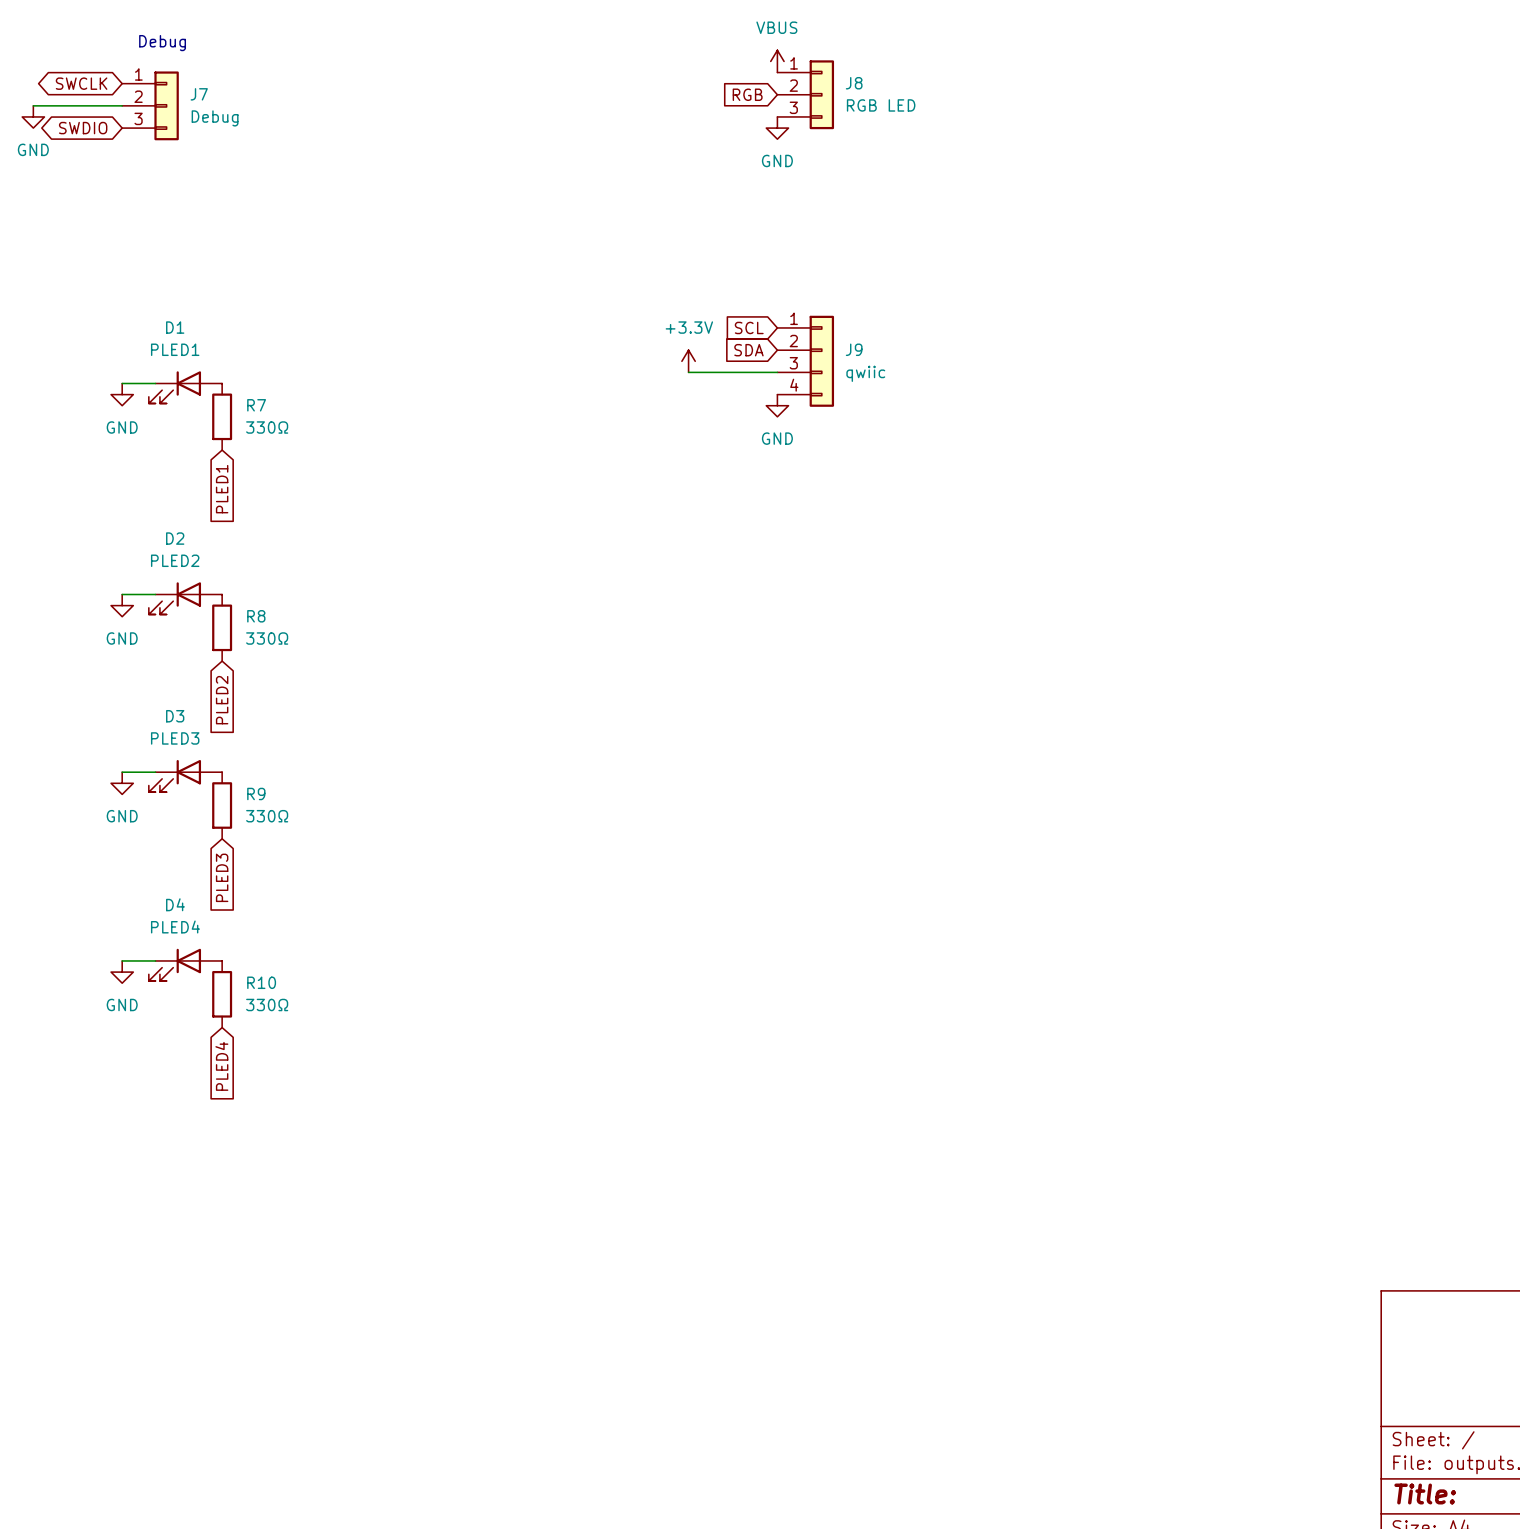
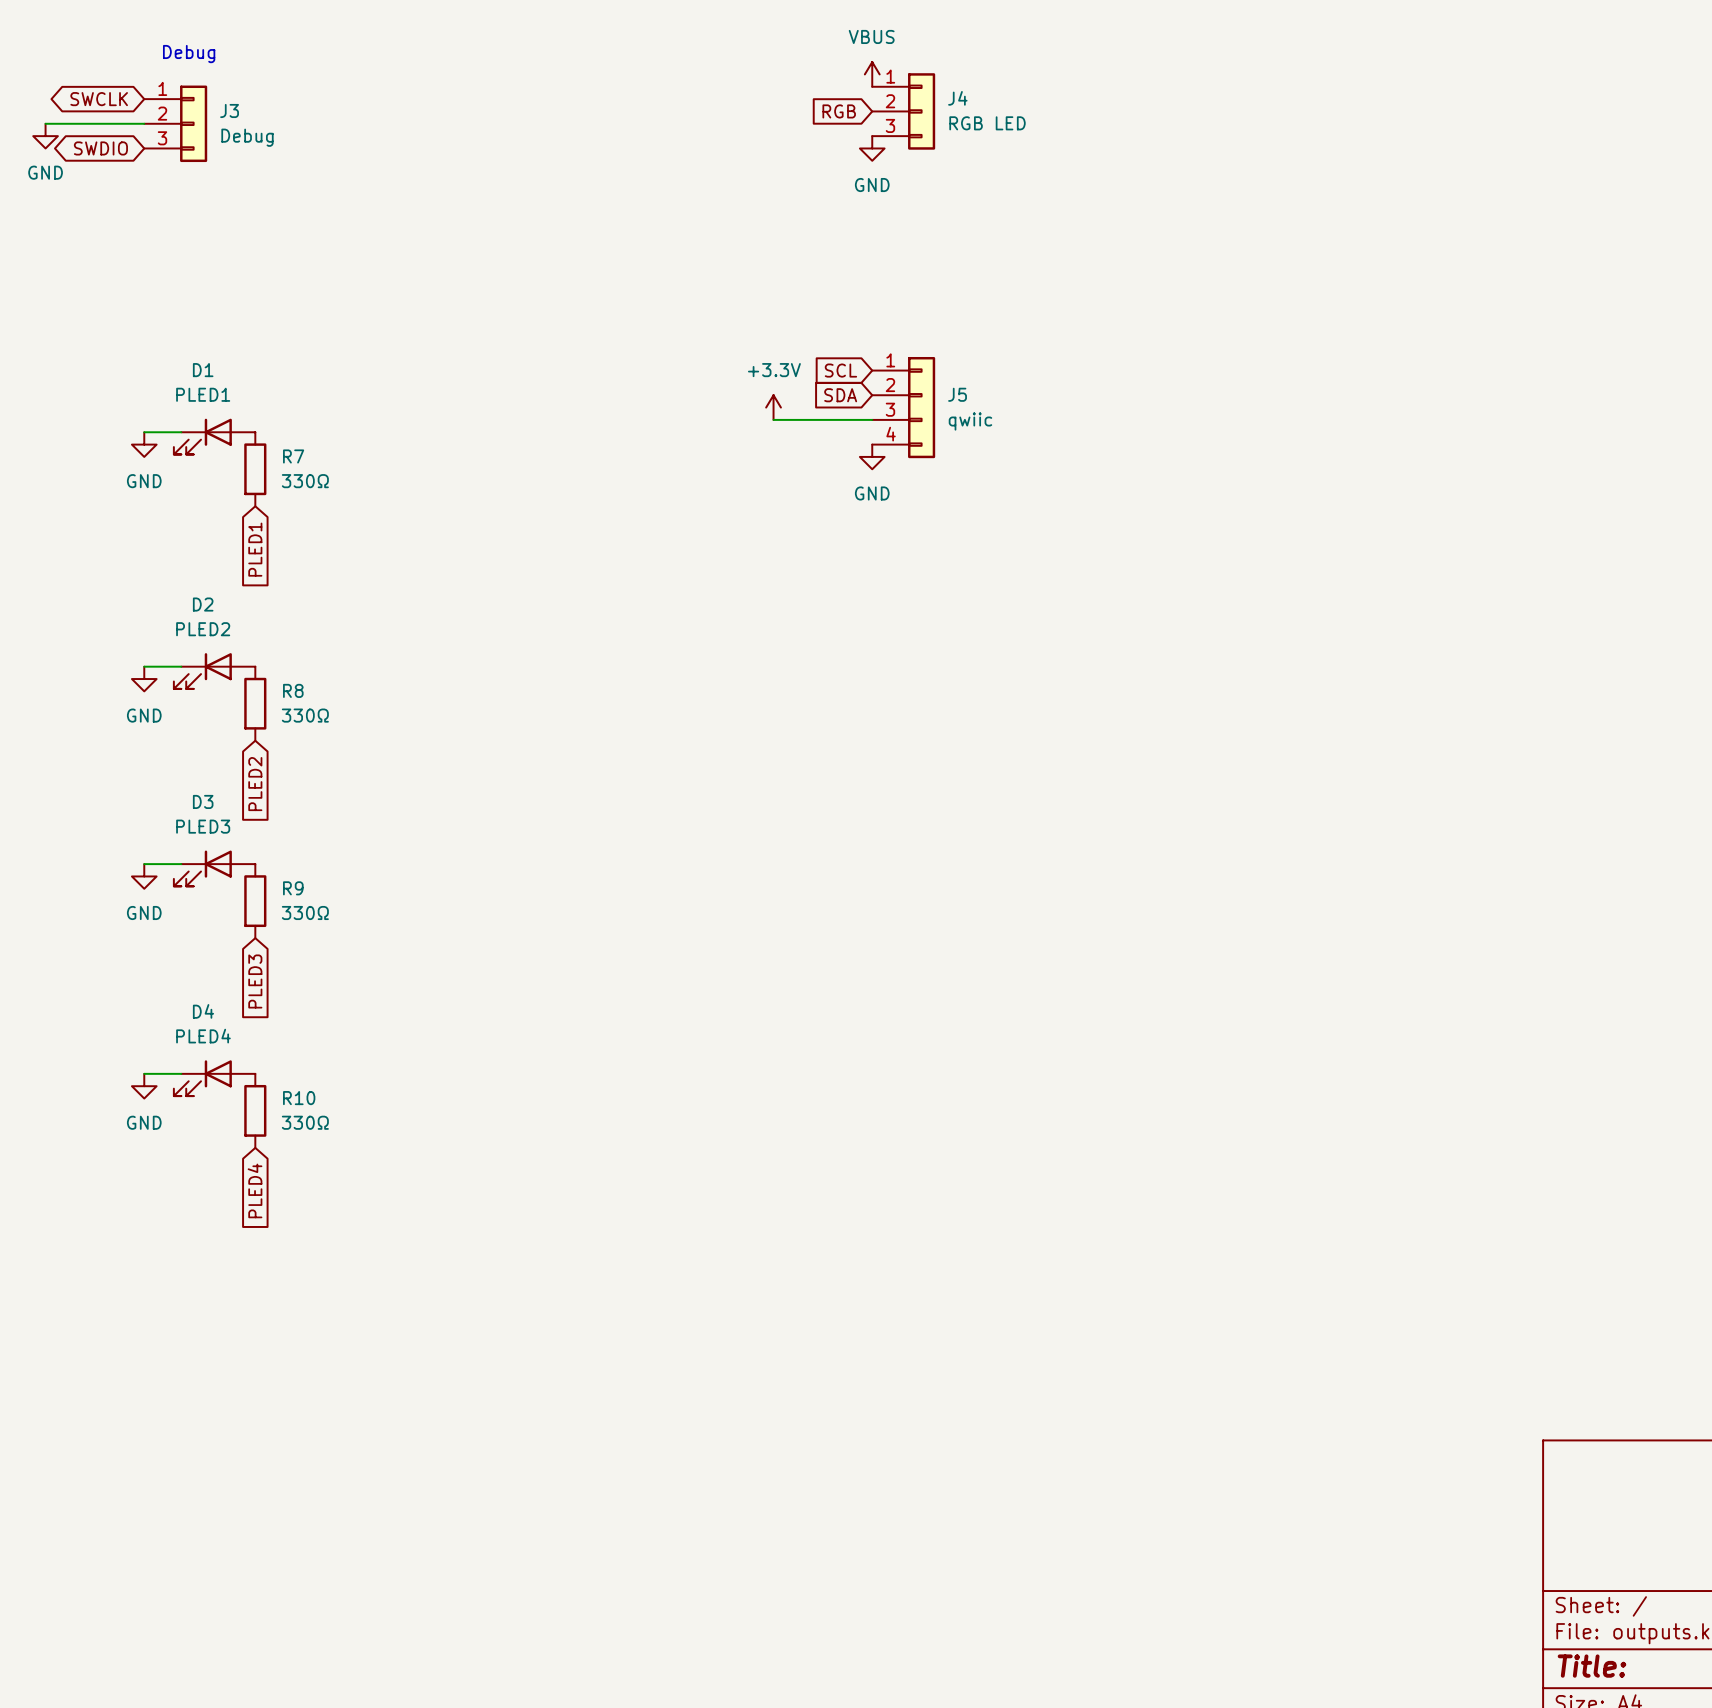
J8 name: J8 (854, 83) -> J4 (957, 98)
J7 name: J7 (199, 94) -> J3 (229, 110)
J9 name: J9 (854, 349) -> J5 (957, 394)

